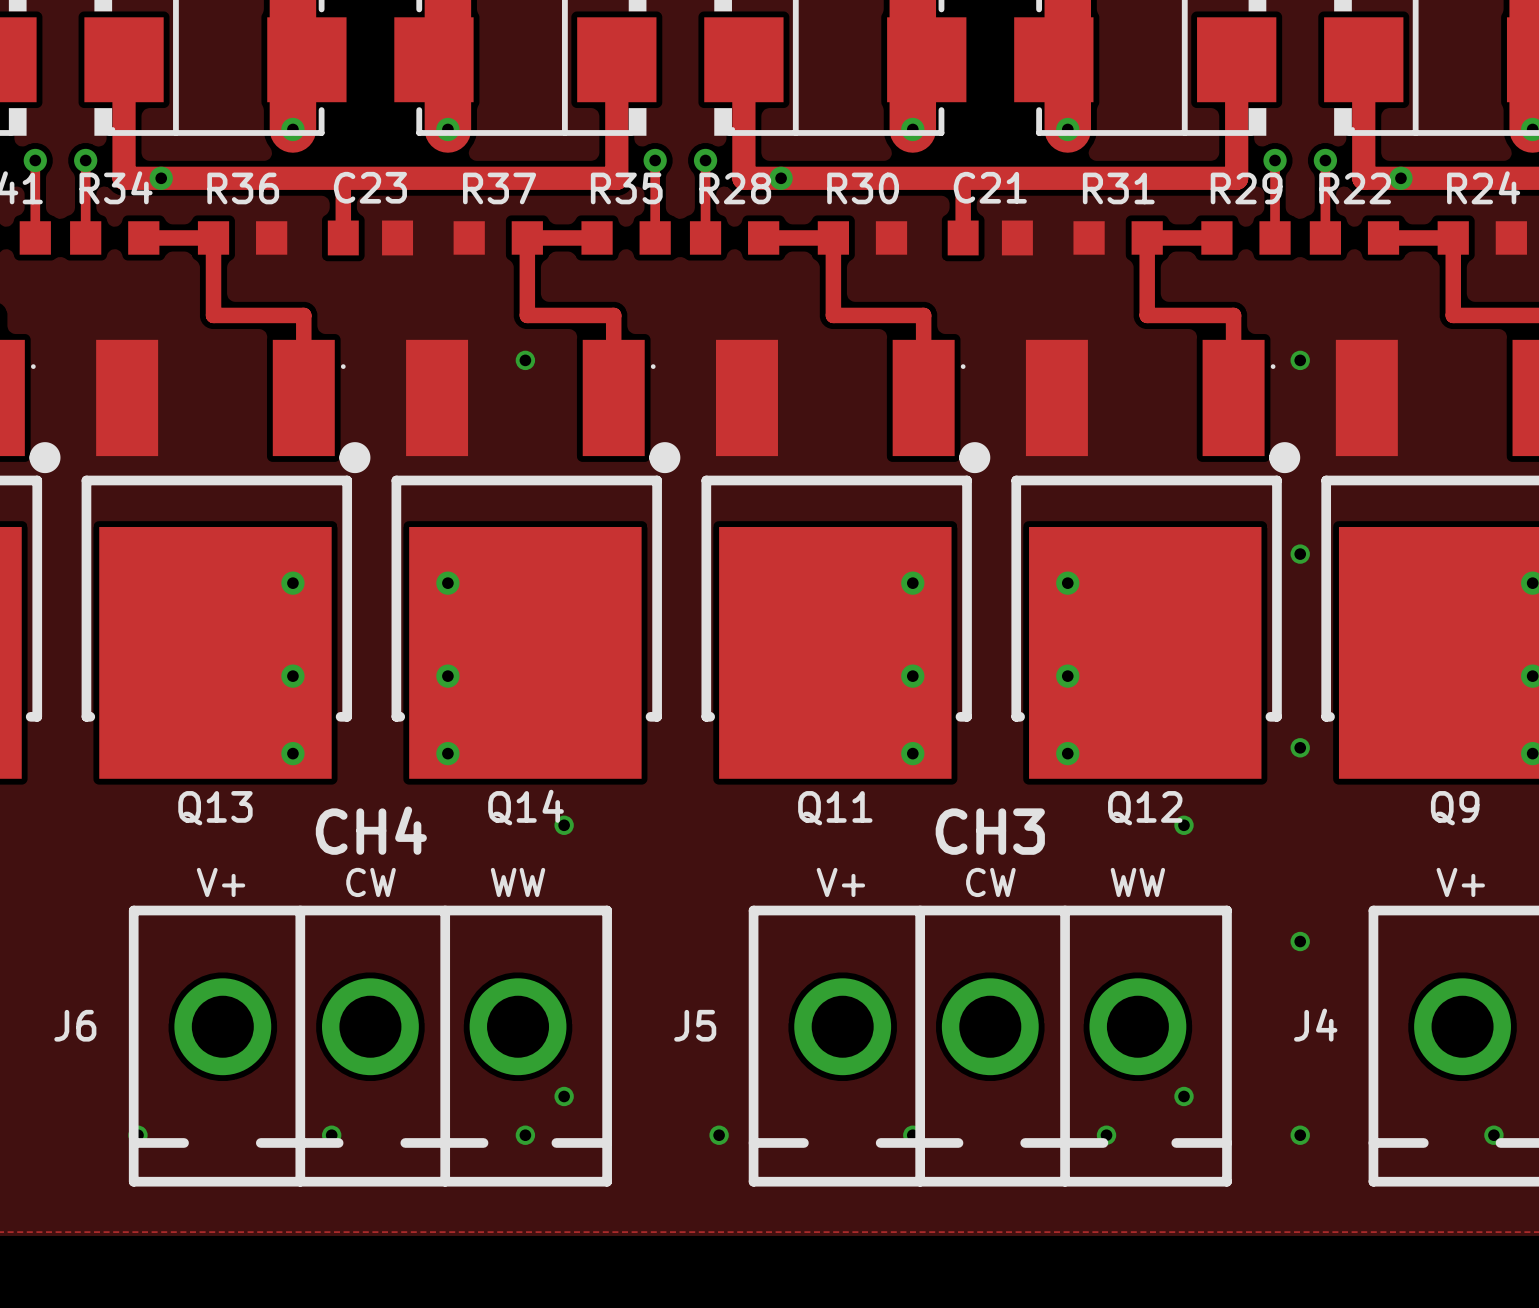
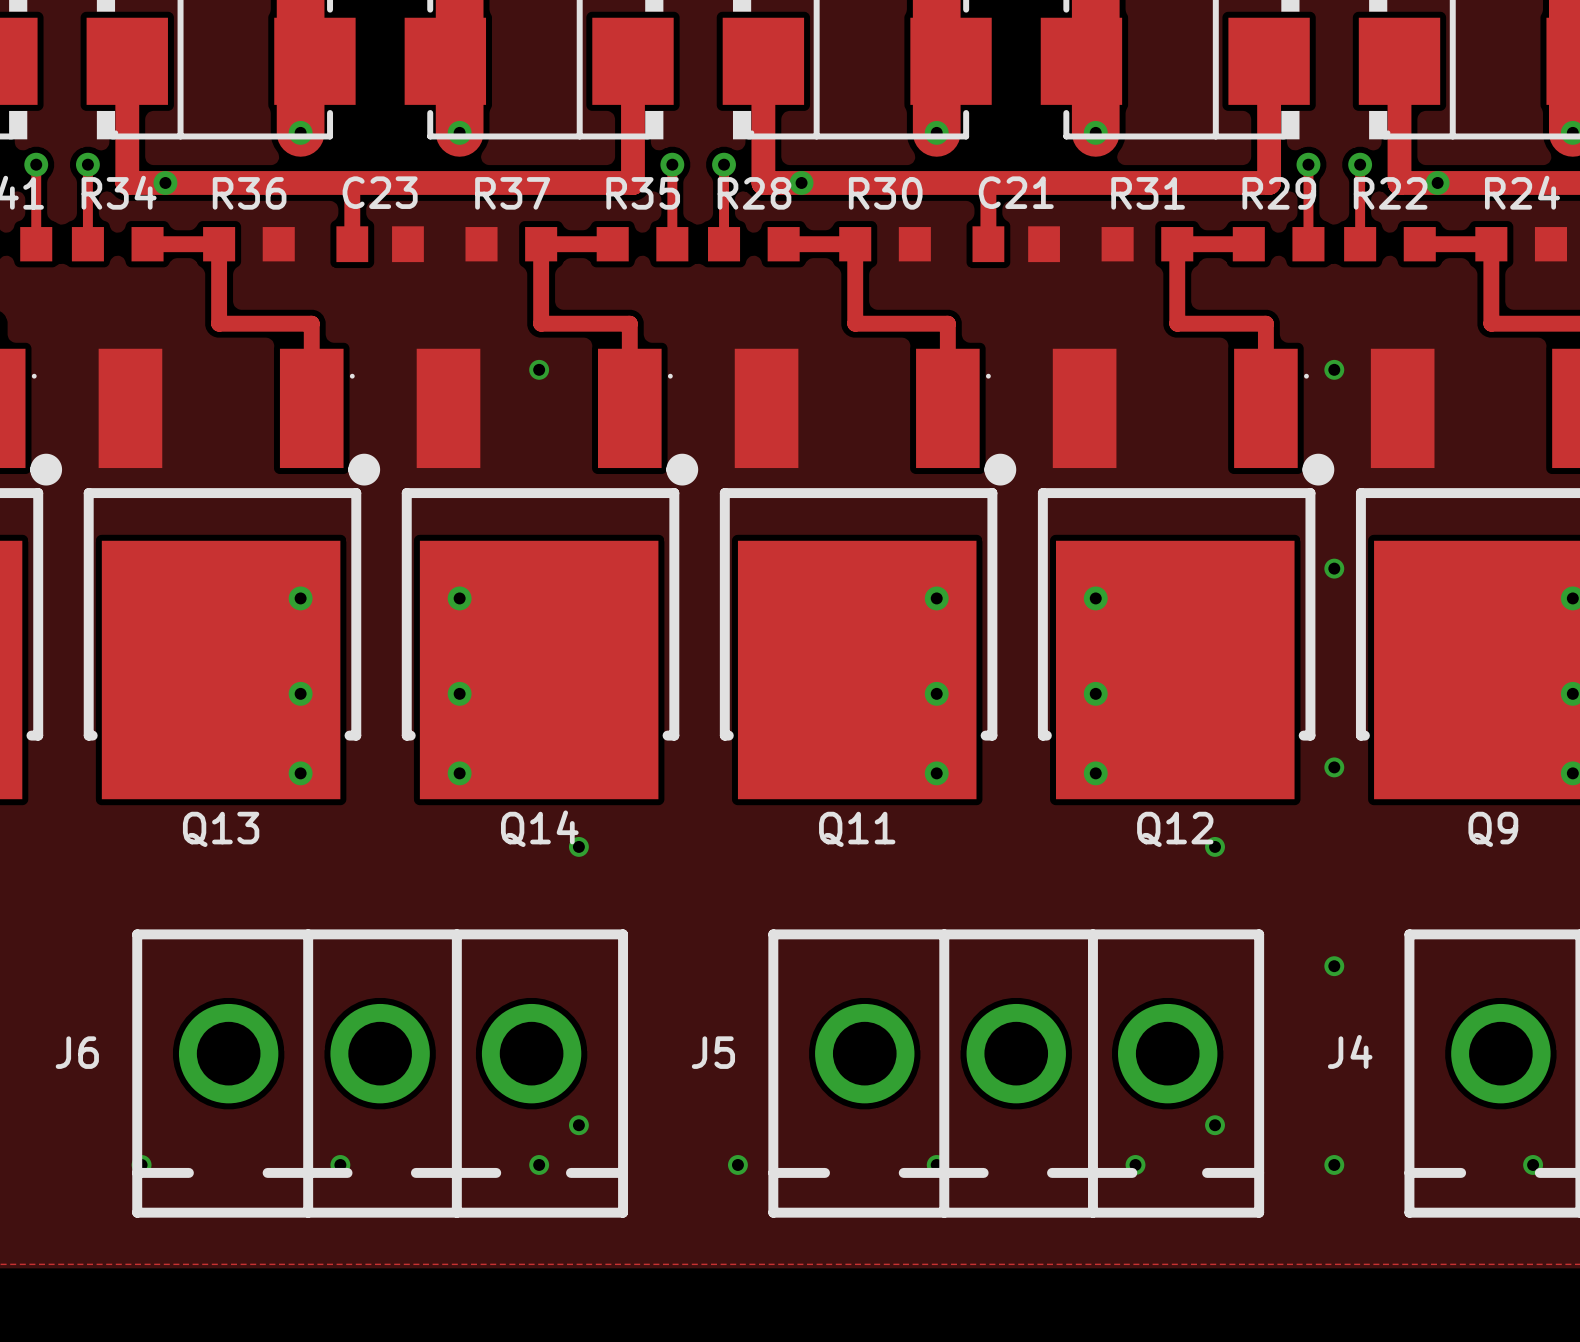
text: CH4 (371, 830) -> none
text: CH3 (990, 831) -> none
text: V+ (221, 882) -> none
text: CW (371, 882) -> none
text: WW (518, 882) -> none
text: V+ (840, 882) -> none
text: CW (990, 882) -> none
text: WW (1137, 882) -> none
text: V+ (1460, 882) -> none

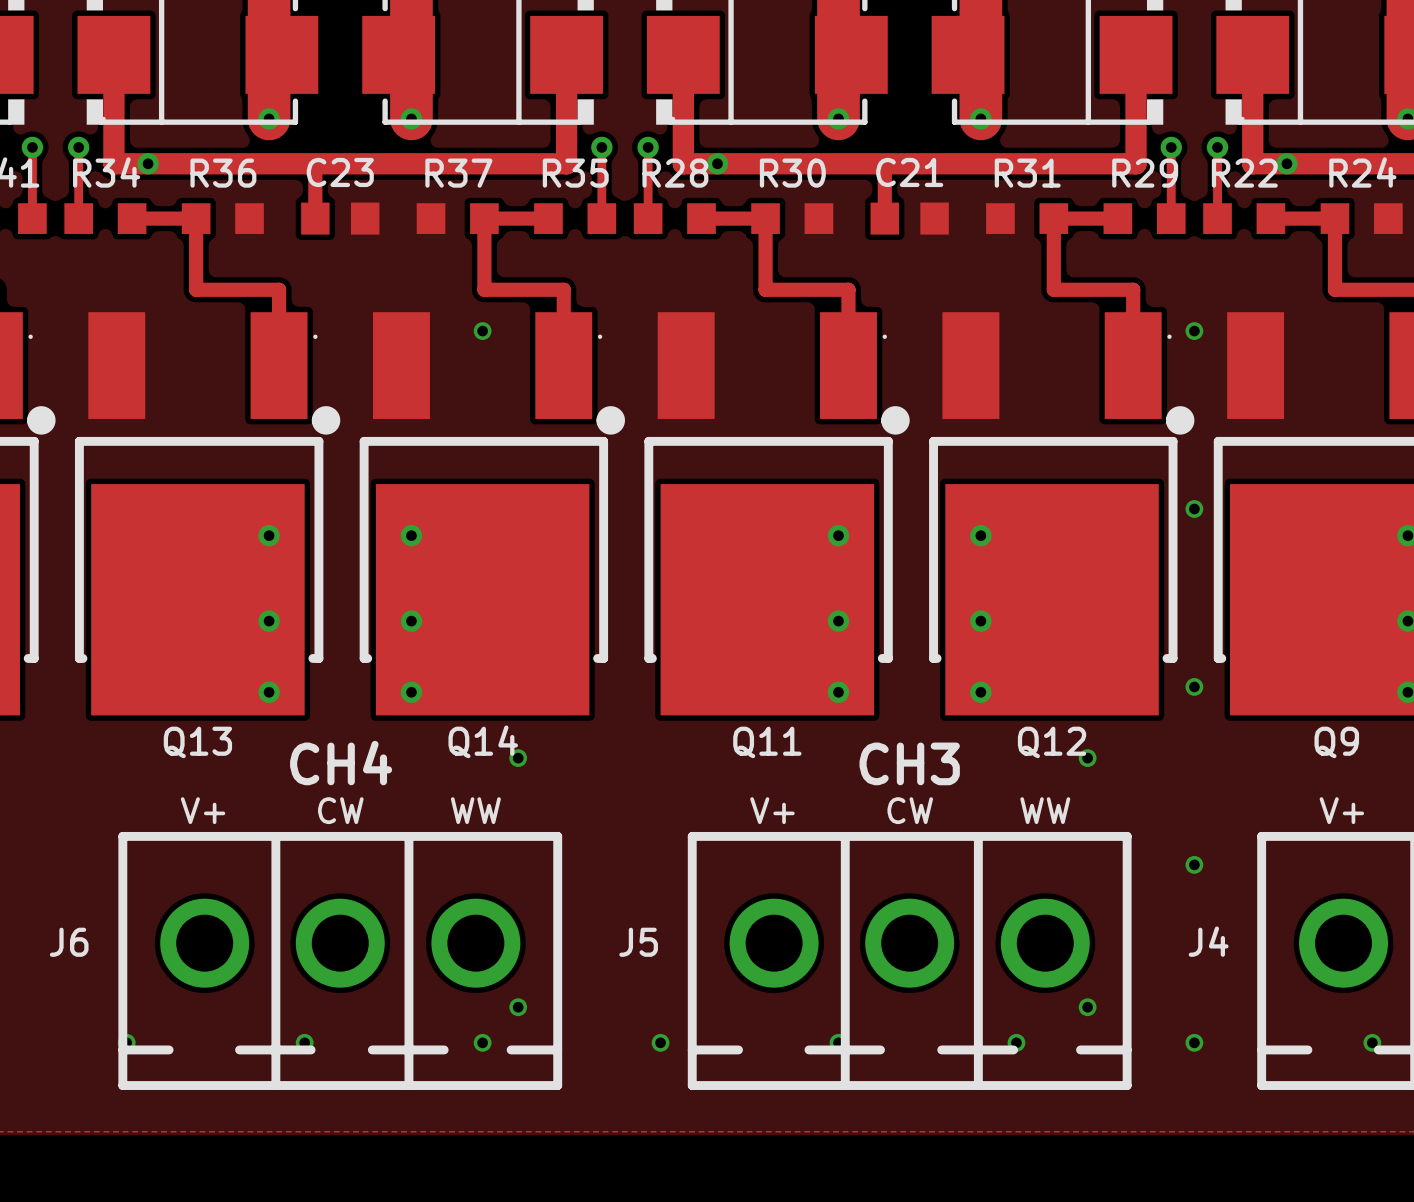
text: none -> CH4 (341, 763)
text: none -> CH3 (909, 763)
text: none -> V+ (203, 810)
text: none -> CW (340, 810)
text: none -> WW (475, 810)
text: none -> V+ (772, 810)
text: none -> CW (910, 810)
text: none -> WW (1045, 810)
text: none -> V+ (1341, 810)

